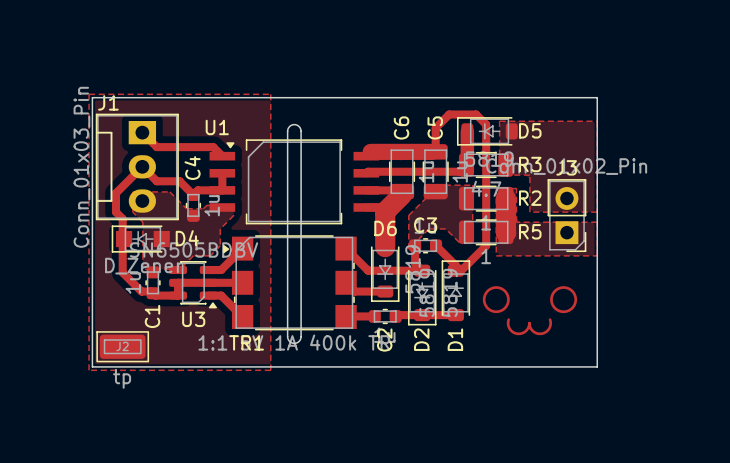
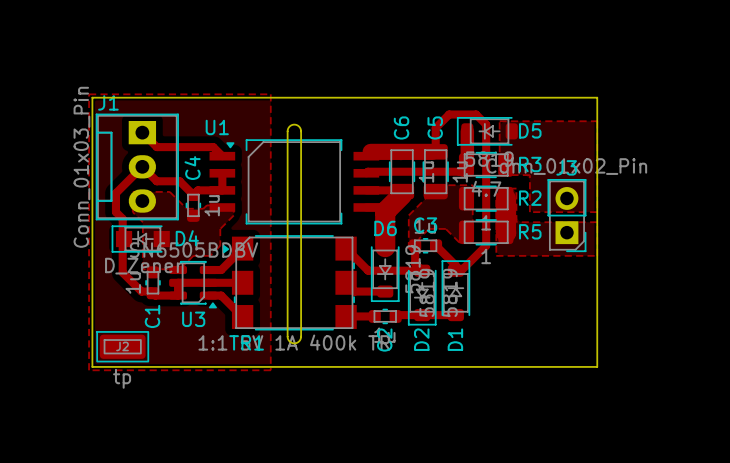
drawing: [482, 286, 510, 314] -> none
drawing: [550, 286, 578, 314] -> none
track: (508, 319) (510, 329) (518, 333) (526, 330) (529, 323) (534, 332) (544, 332) (549, 327) (550, 319) -> none

